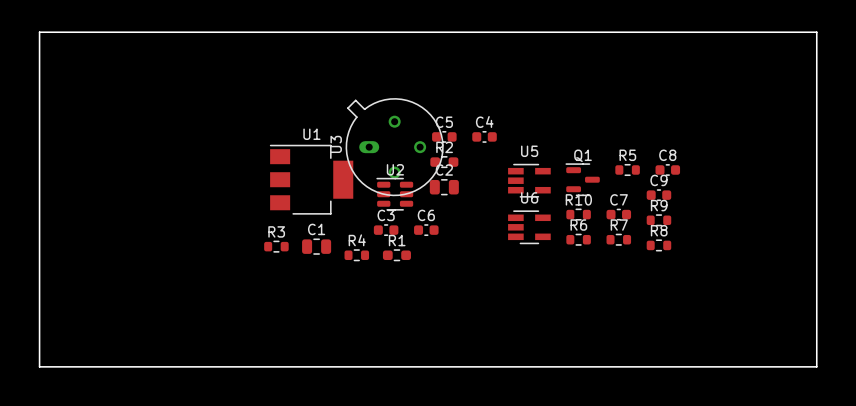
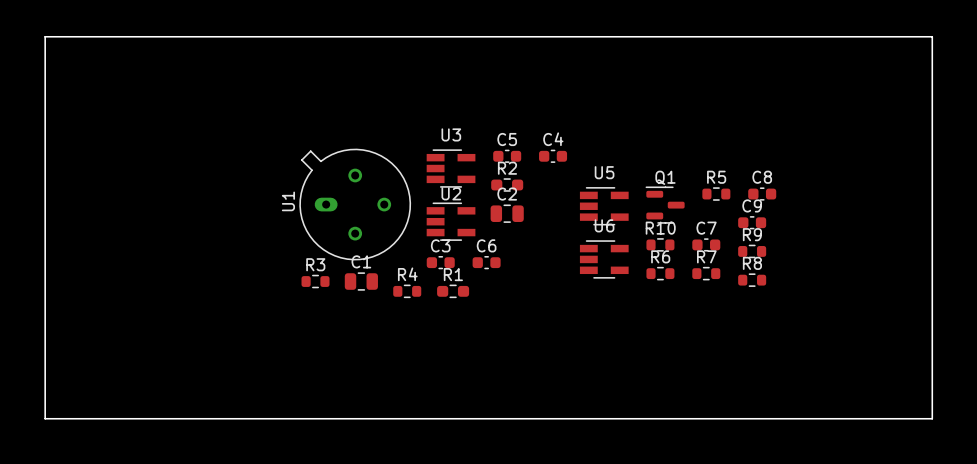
U3 footprint: [345, 98, 444, 197] -> [426, 149, 476, 188]
U1 name position: U1 (311, 134) -> U1 (288, 201)
U1 footprint: [270, 144, 354, 215] -> [299, 148, 411, 261]
U3 name position: U3 (336, 144) -> U3 (451, 134)
U2 footprint: [376, 178, 414, 211] -> [426, 202, 476, 241]

